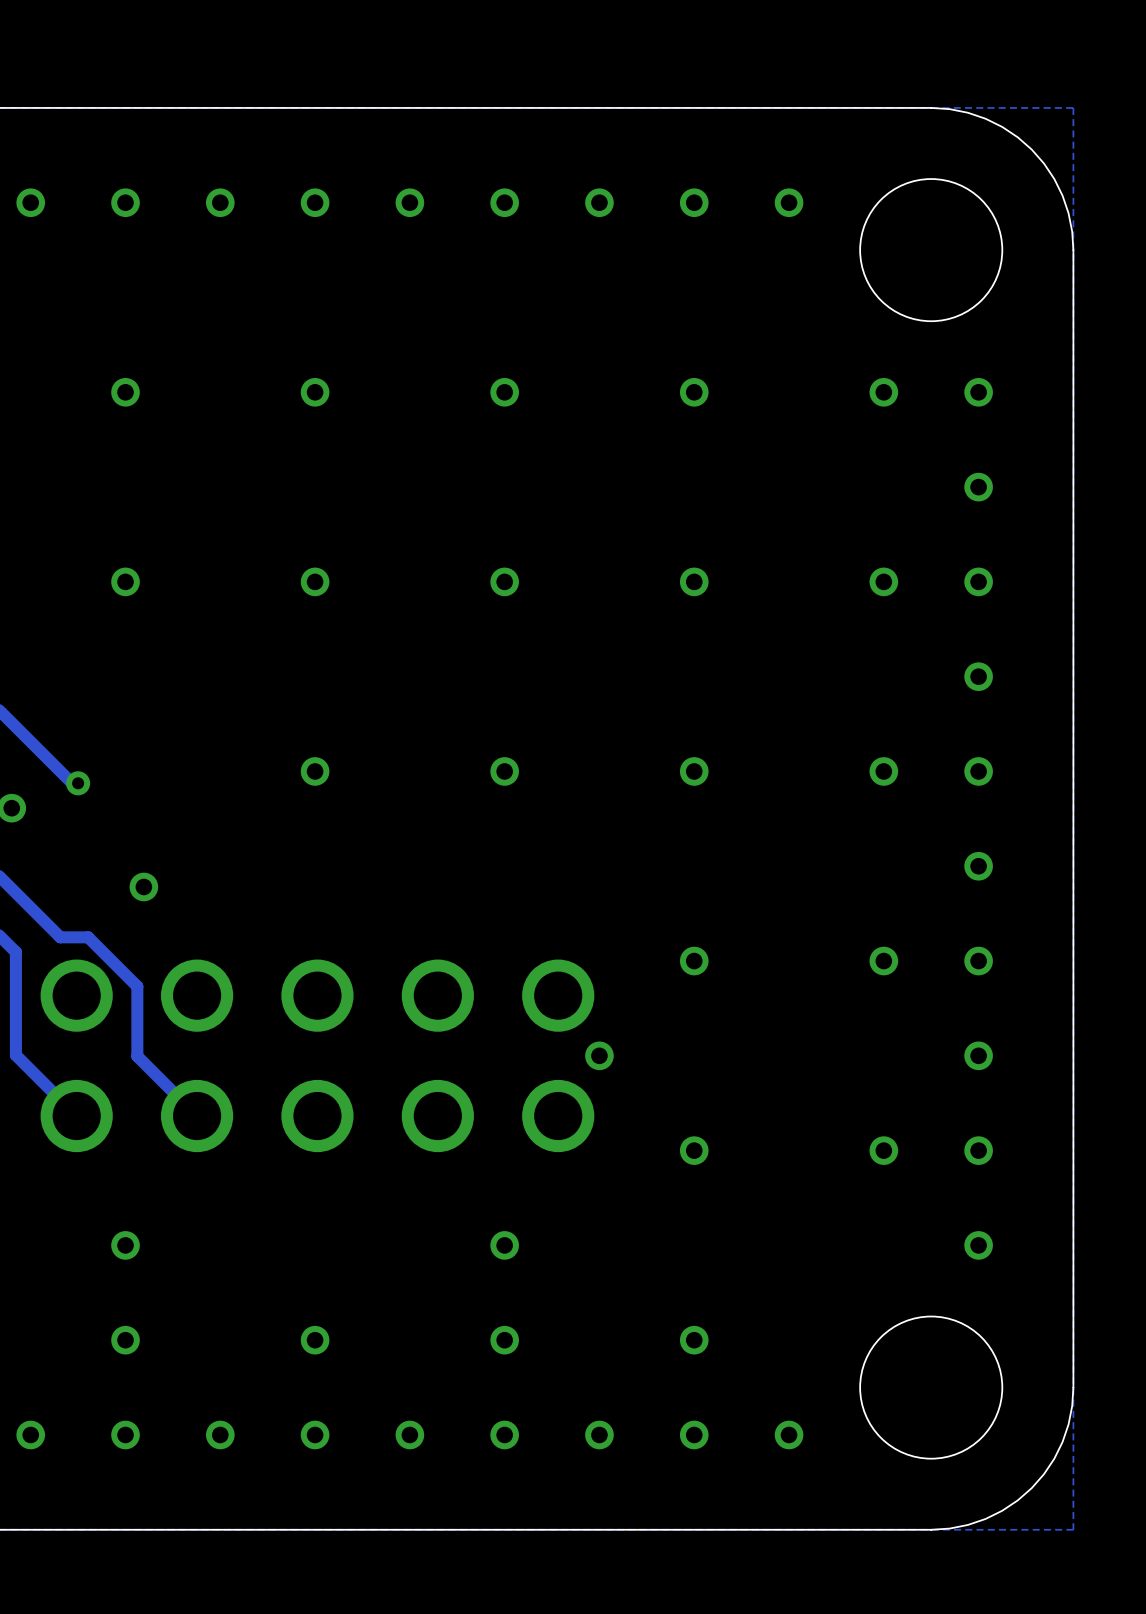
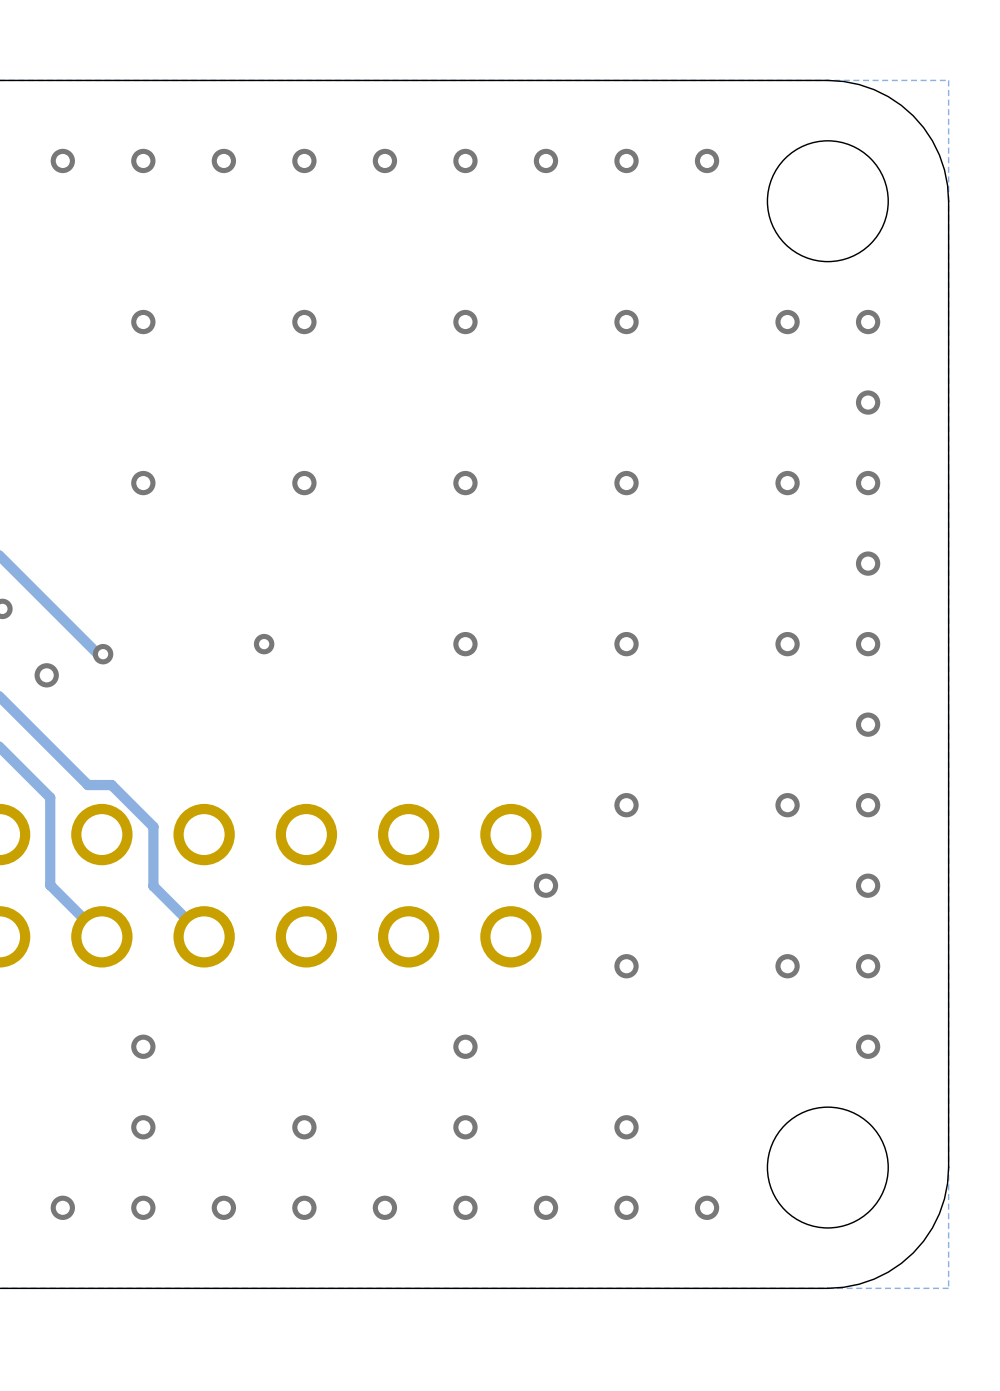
via: none -> (264, 644)
via: (315, 771) -> none
via: (143, 886) -> none

